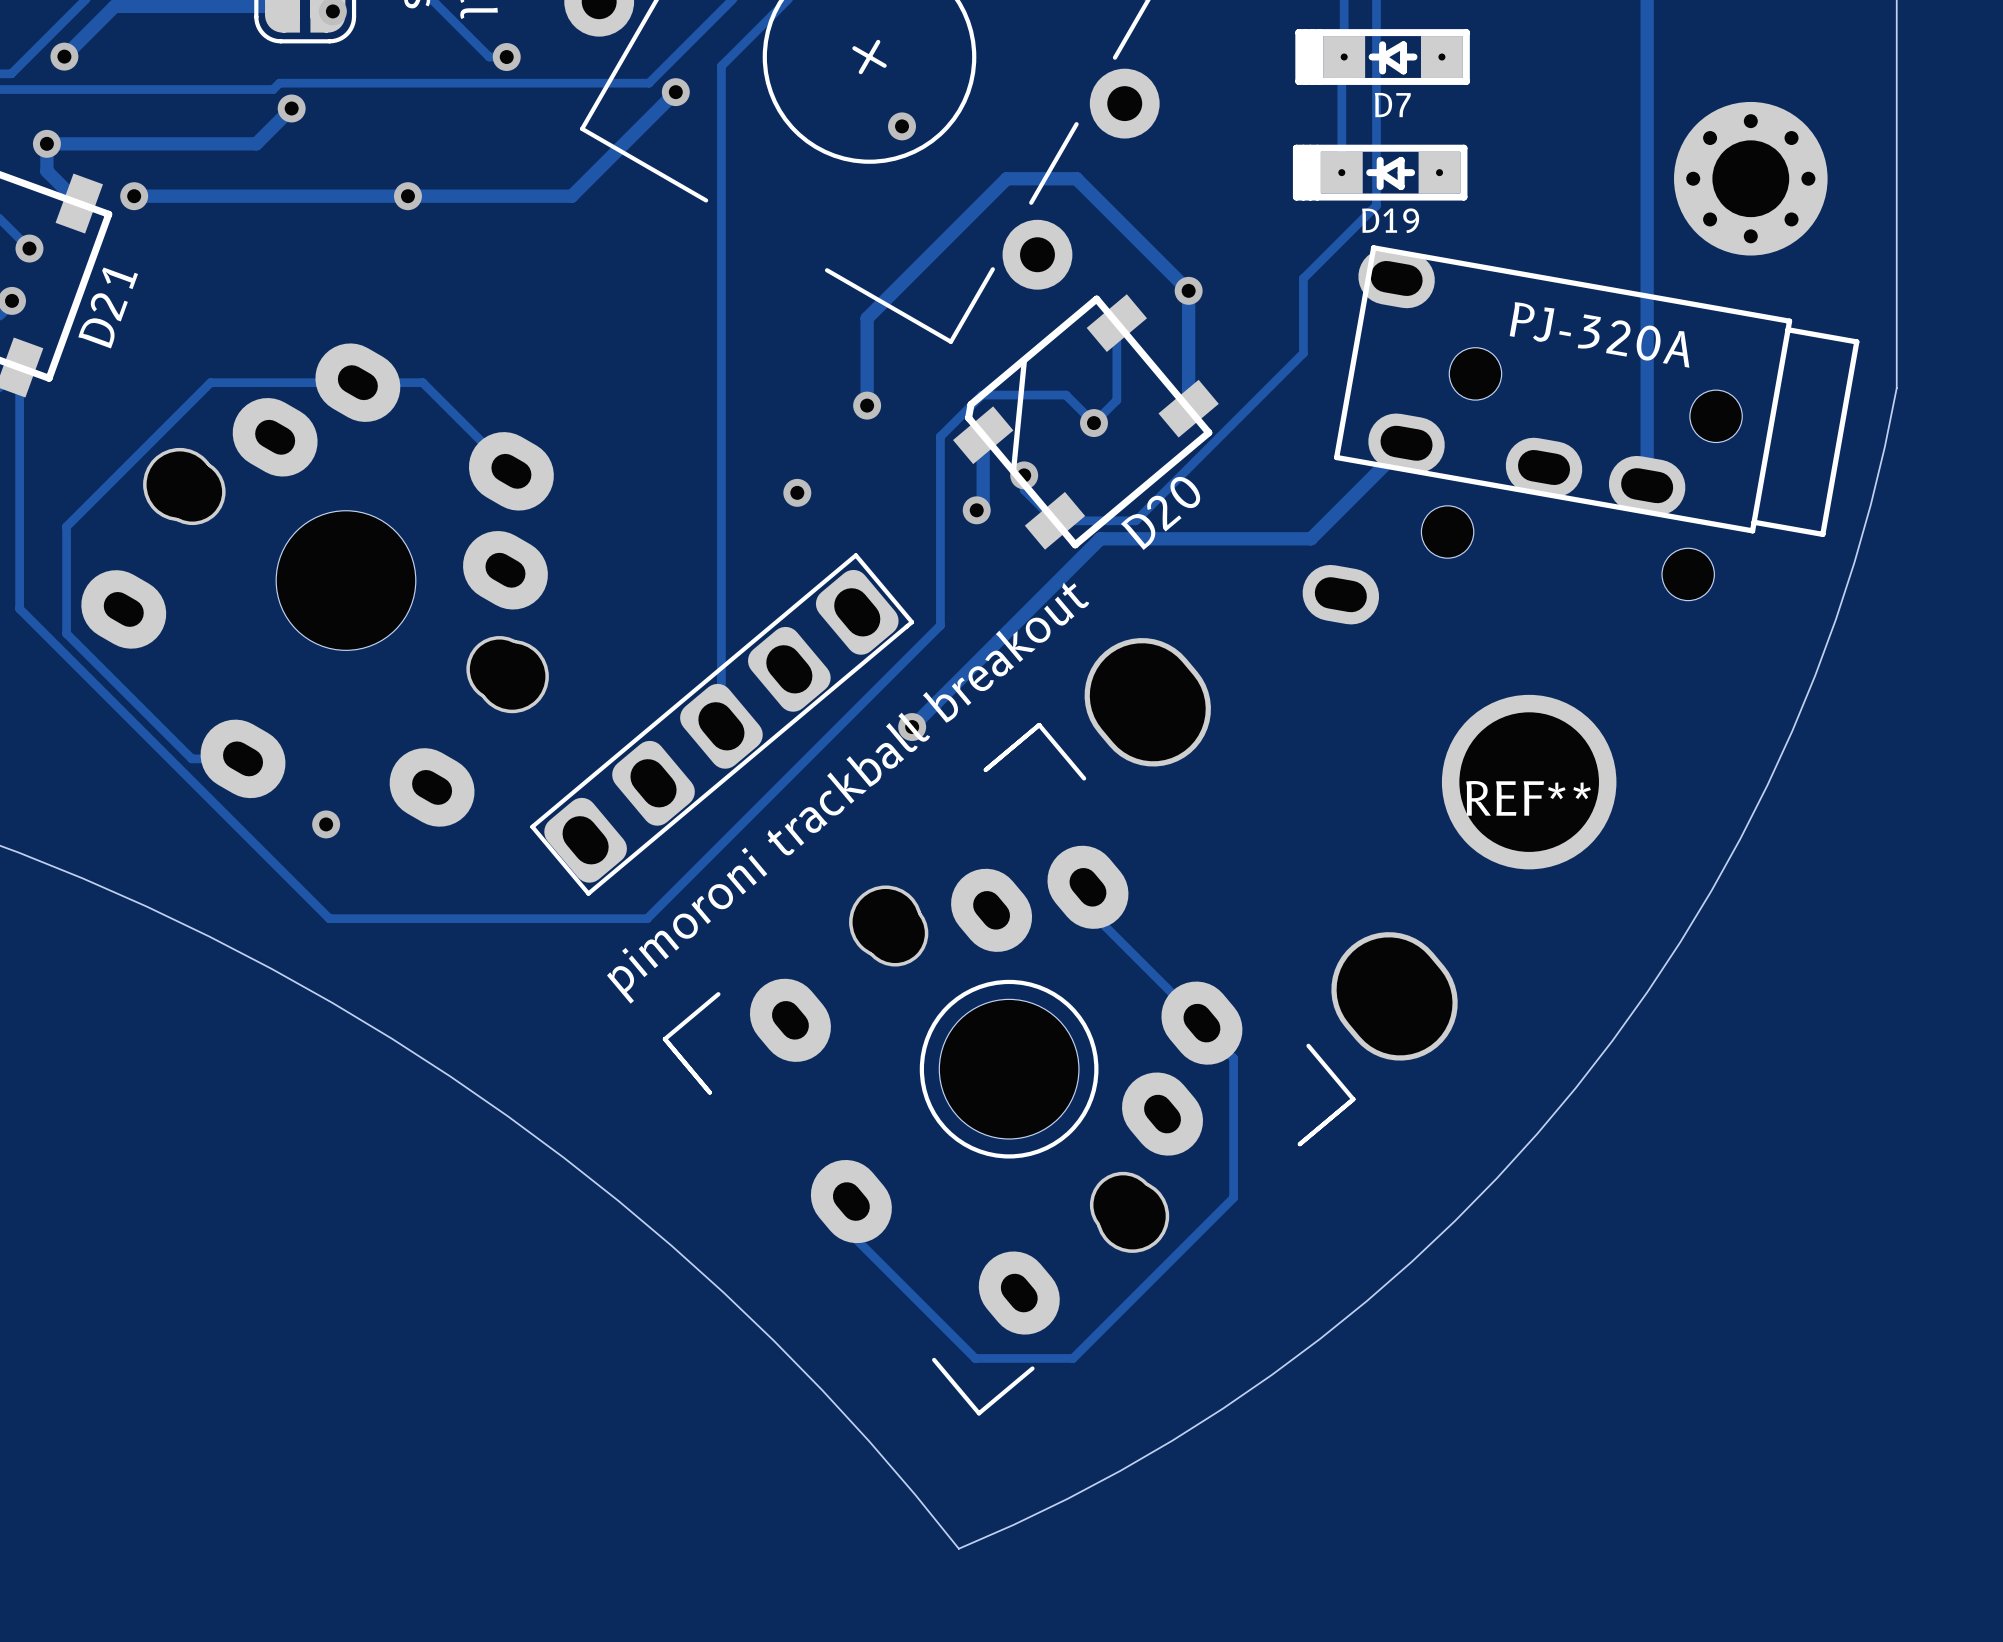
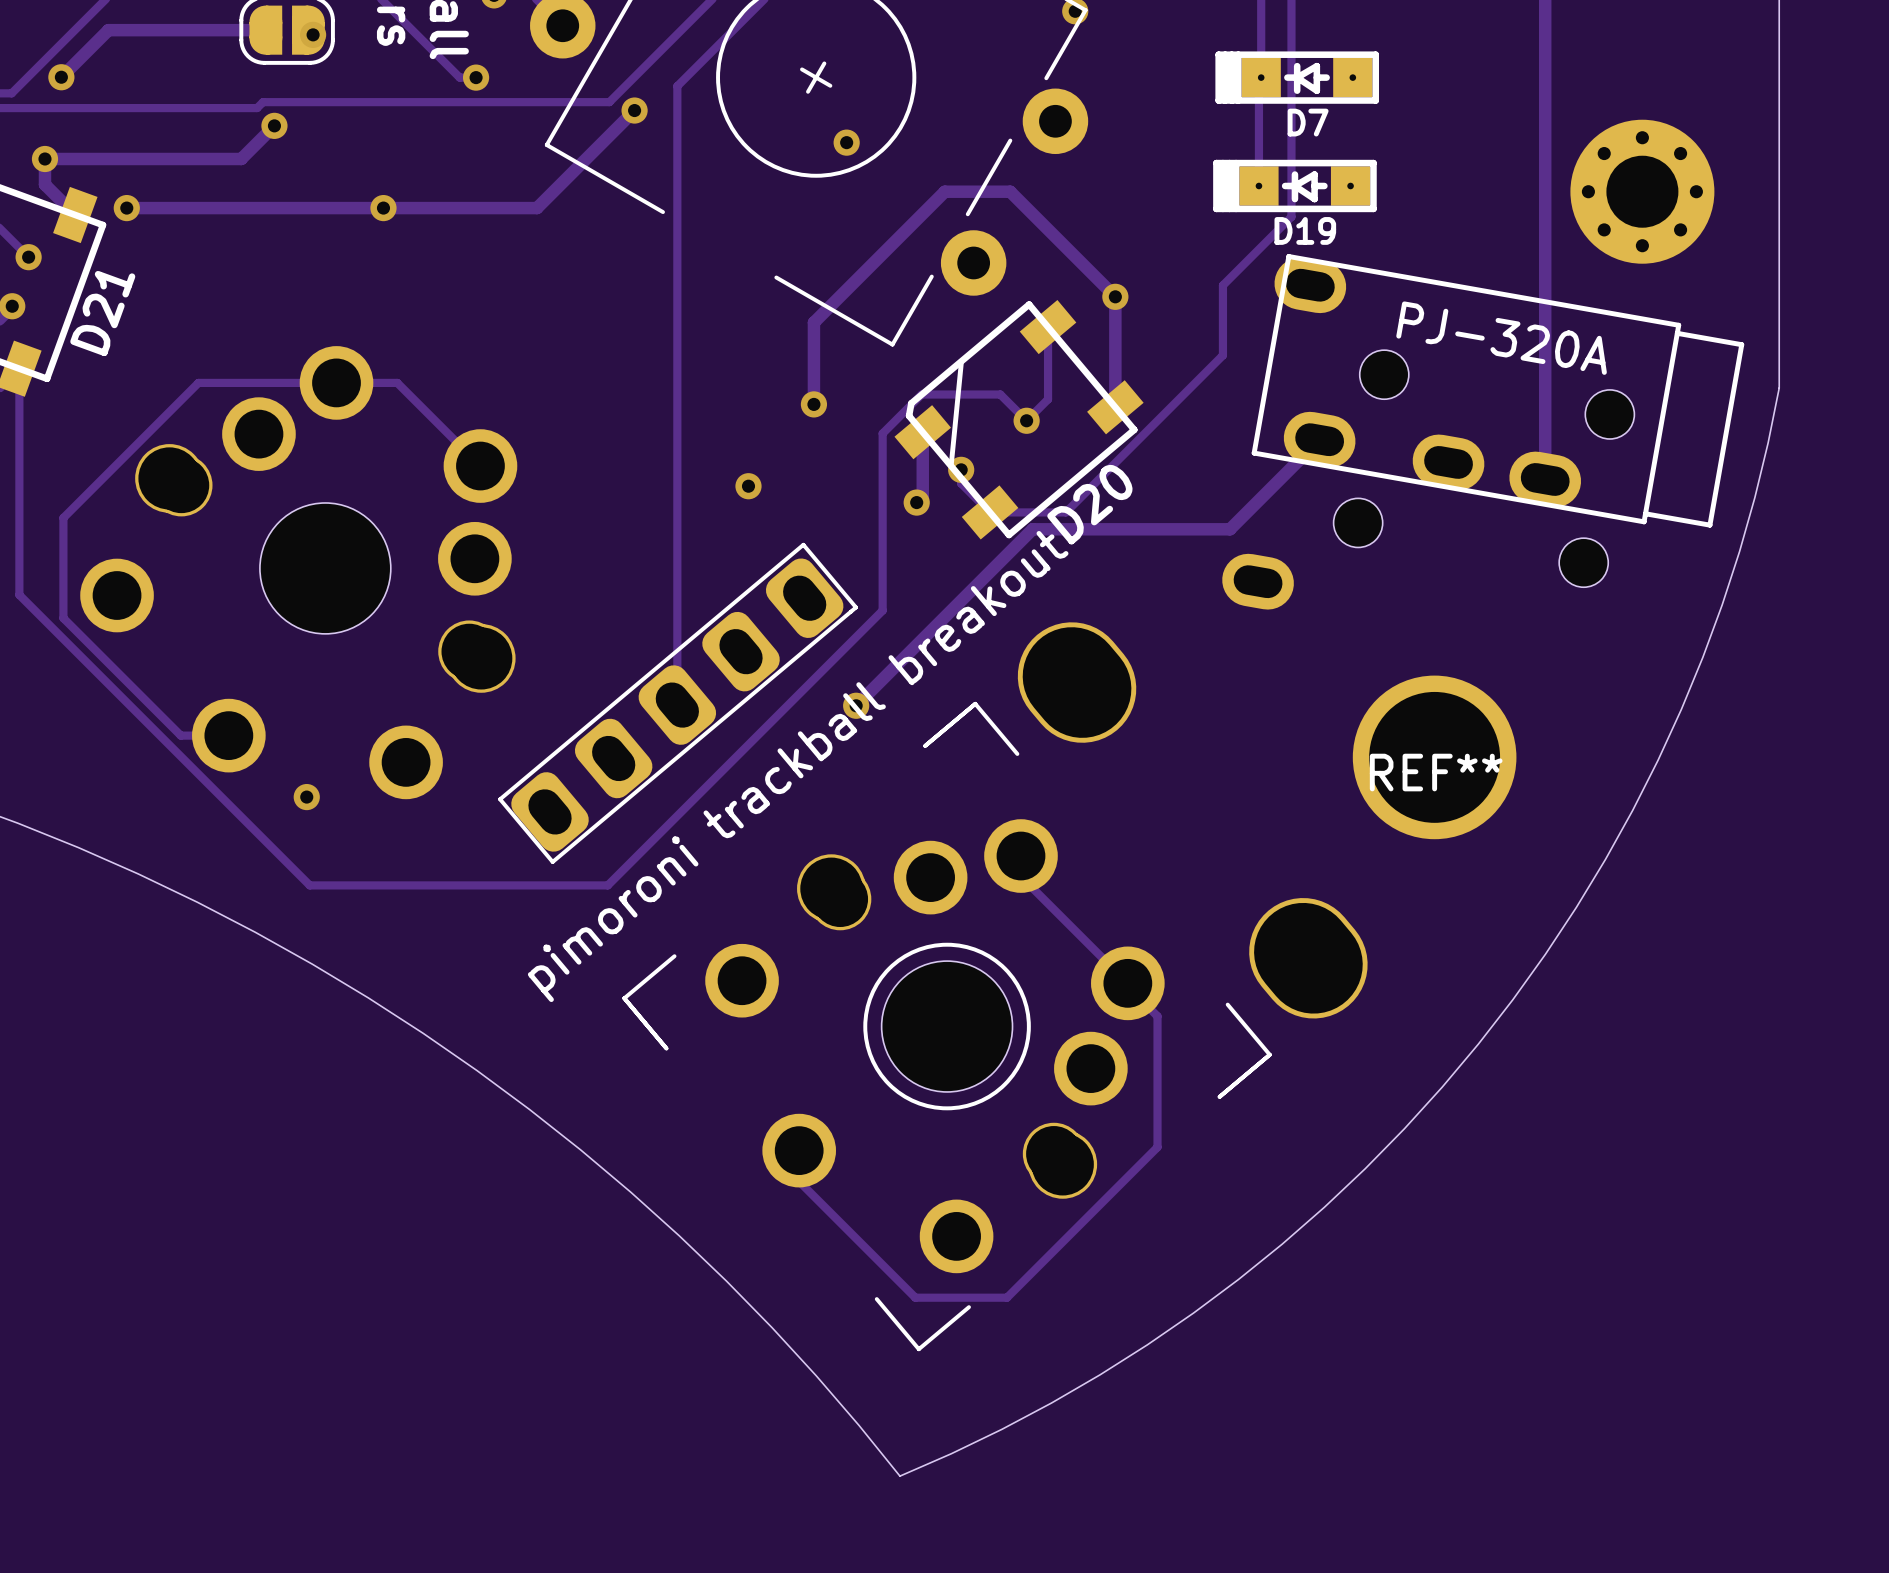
part footprint: [81, 343, 554, 827] -> [80, 346, 518, 800]
part footprint: [749, 845, 1243, 1335] -> [705, 819, 1165, 1274]

